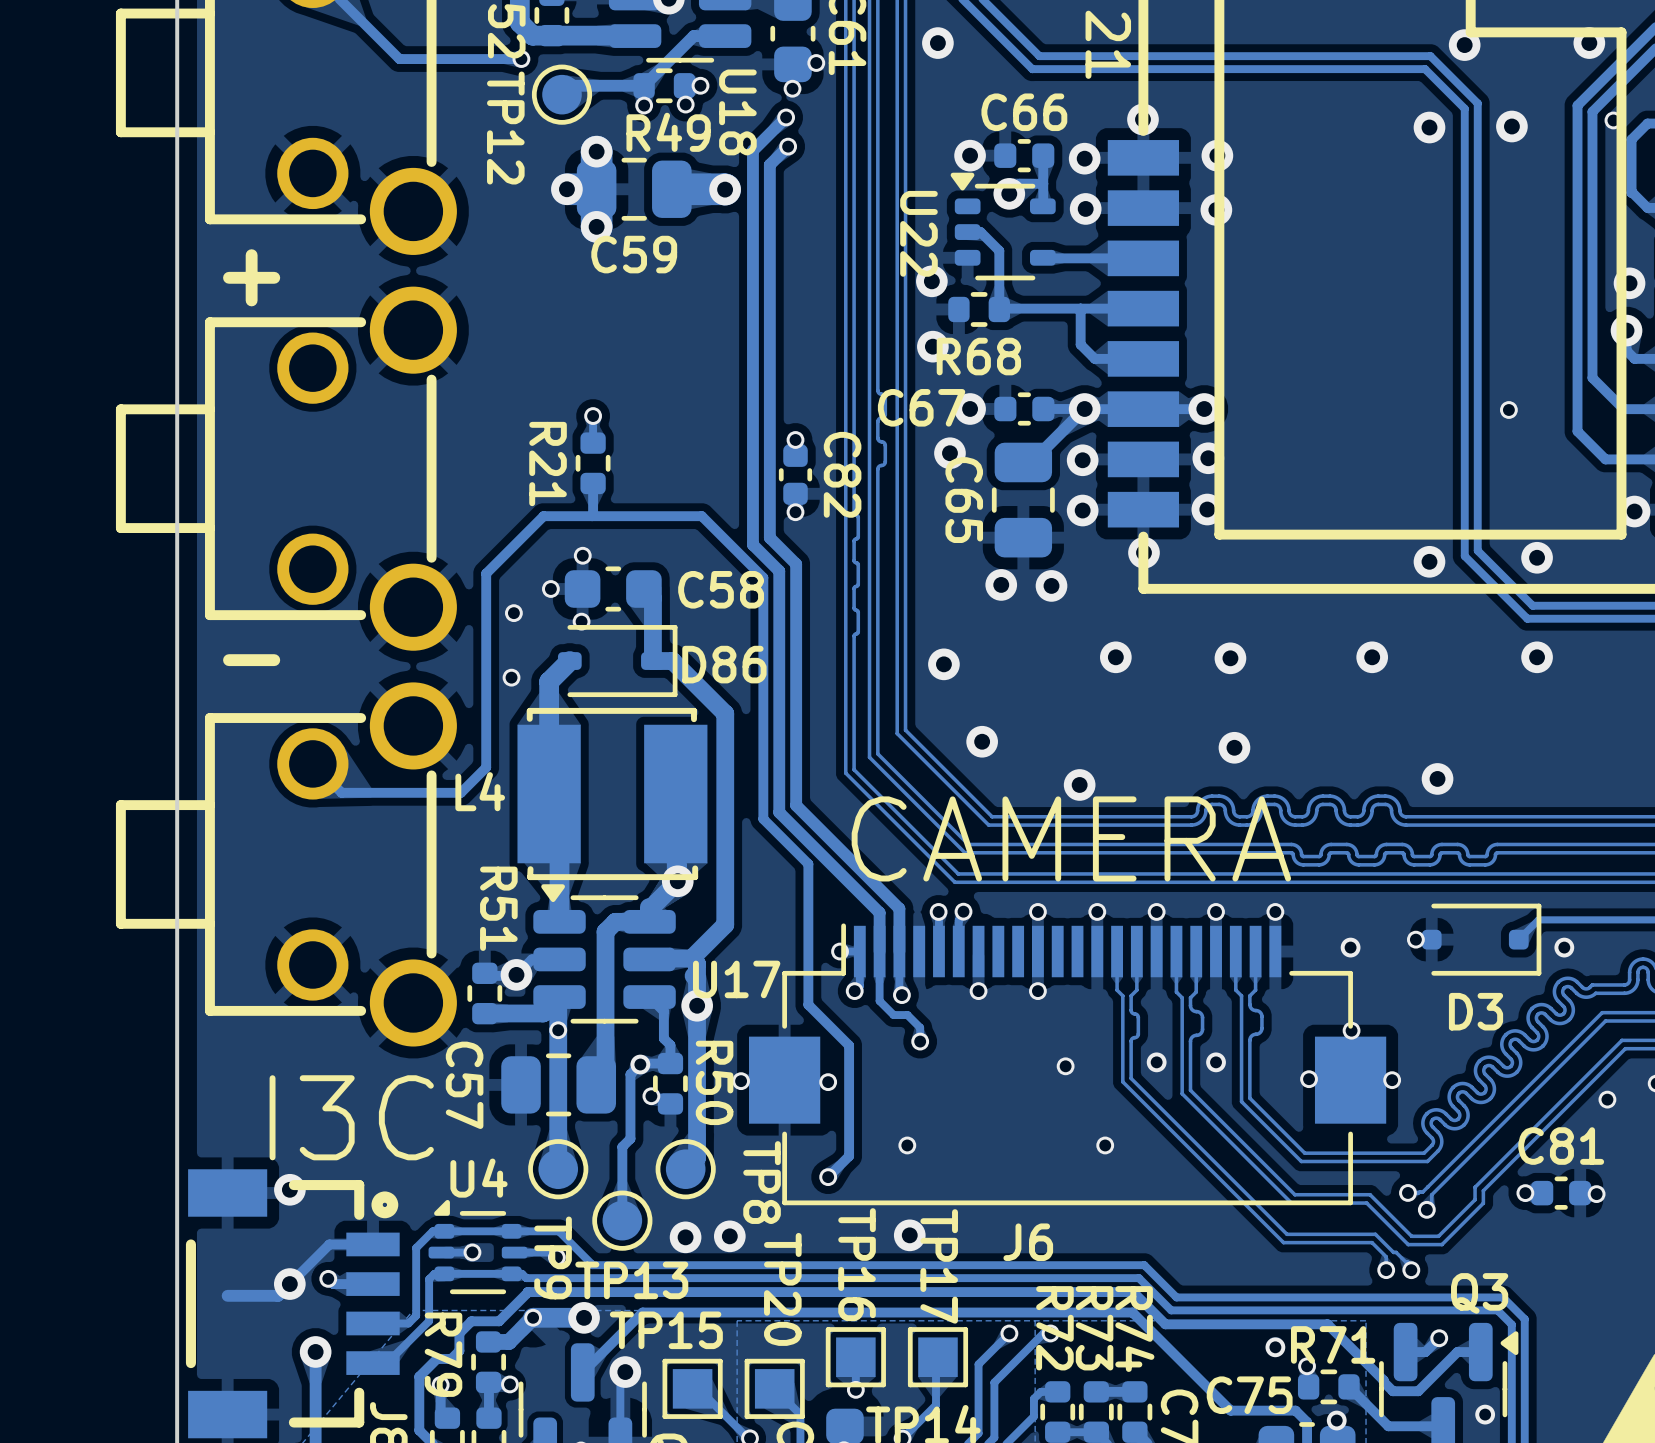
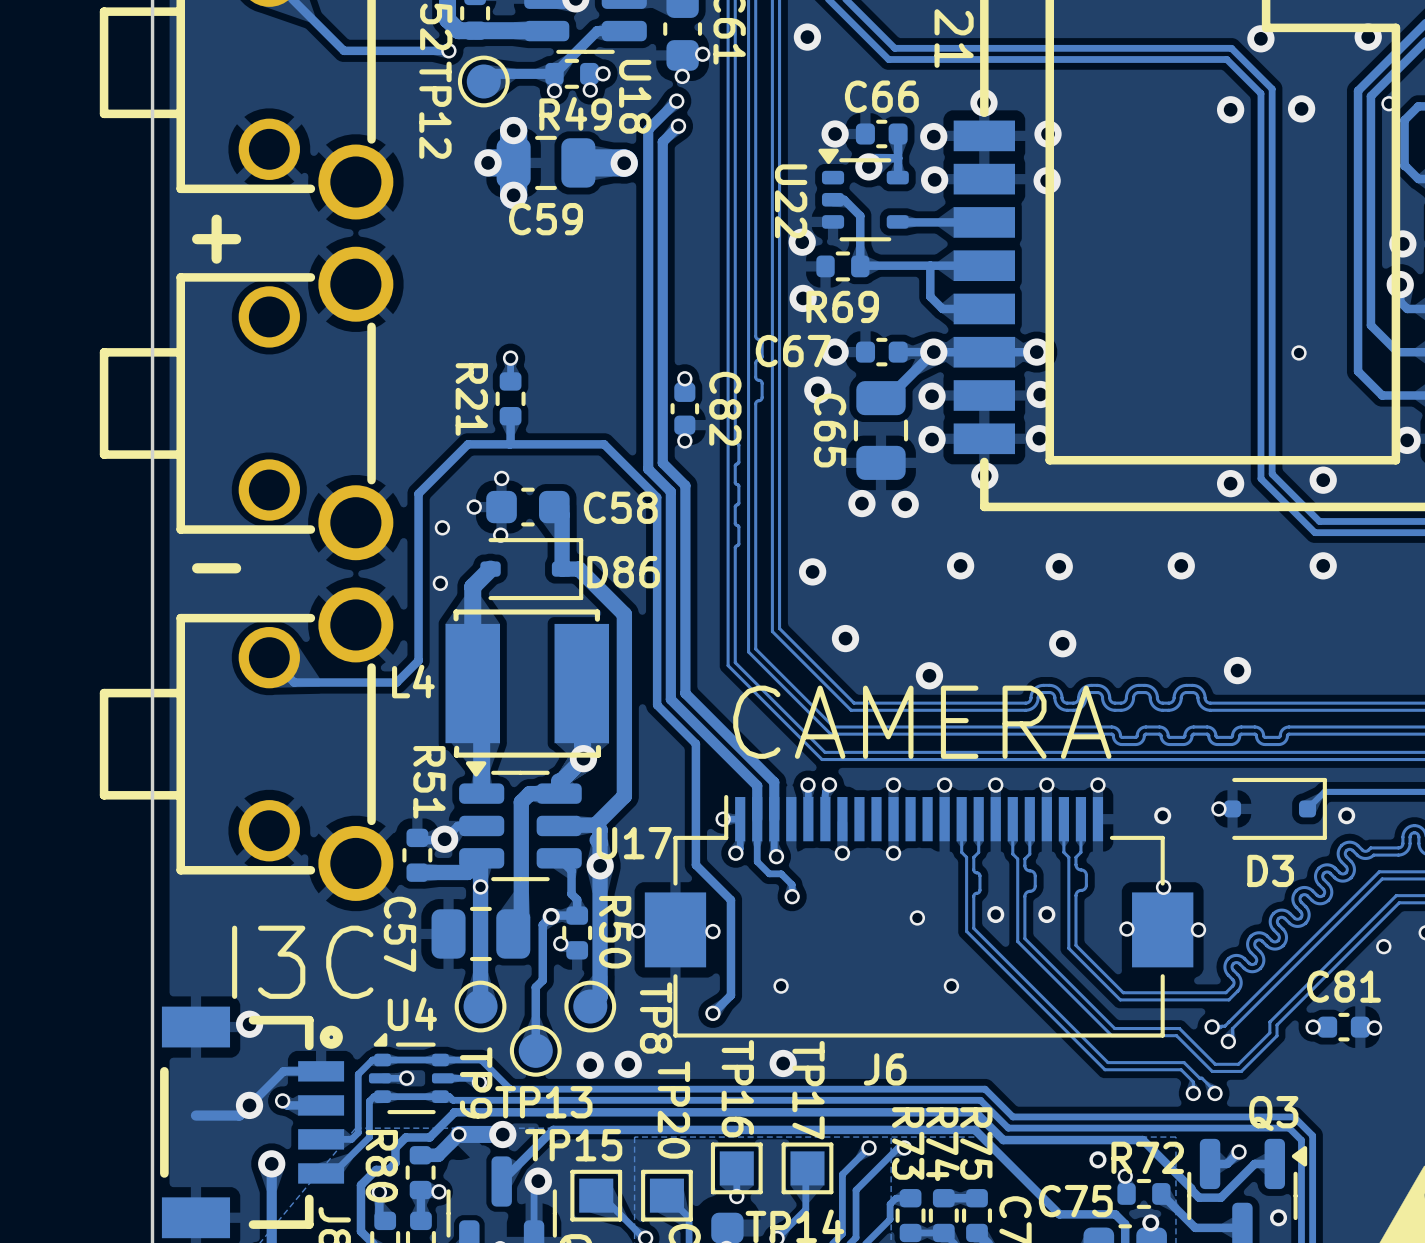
R68 name: R68 (978, 356) -> R69 (842, 306)
R72 name: R72 (1054, 1328) -> R73 (908, 1143)
R73 name: R73 (1094, 1328) -> R74 (942, 1144)
R74 name: R74 (1134, 1329) -> R75 (976, 1143)
R71 name: R71 (1333, 1344) -> R72 (1147, 1157)
R79 name: R79 (443, 1354) -> R80 (381, 1166)

